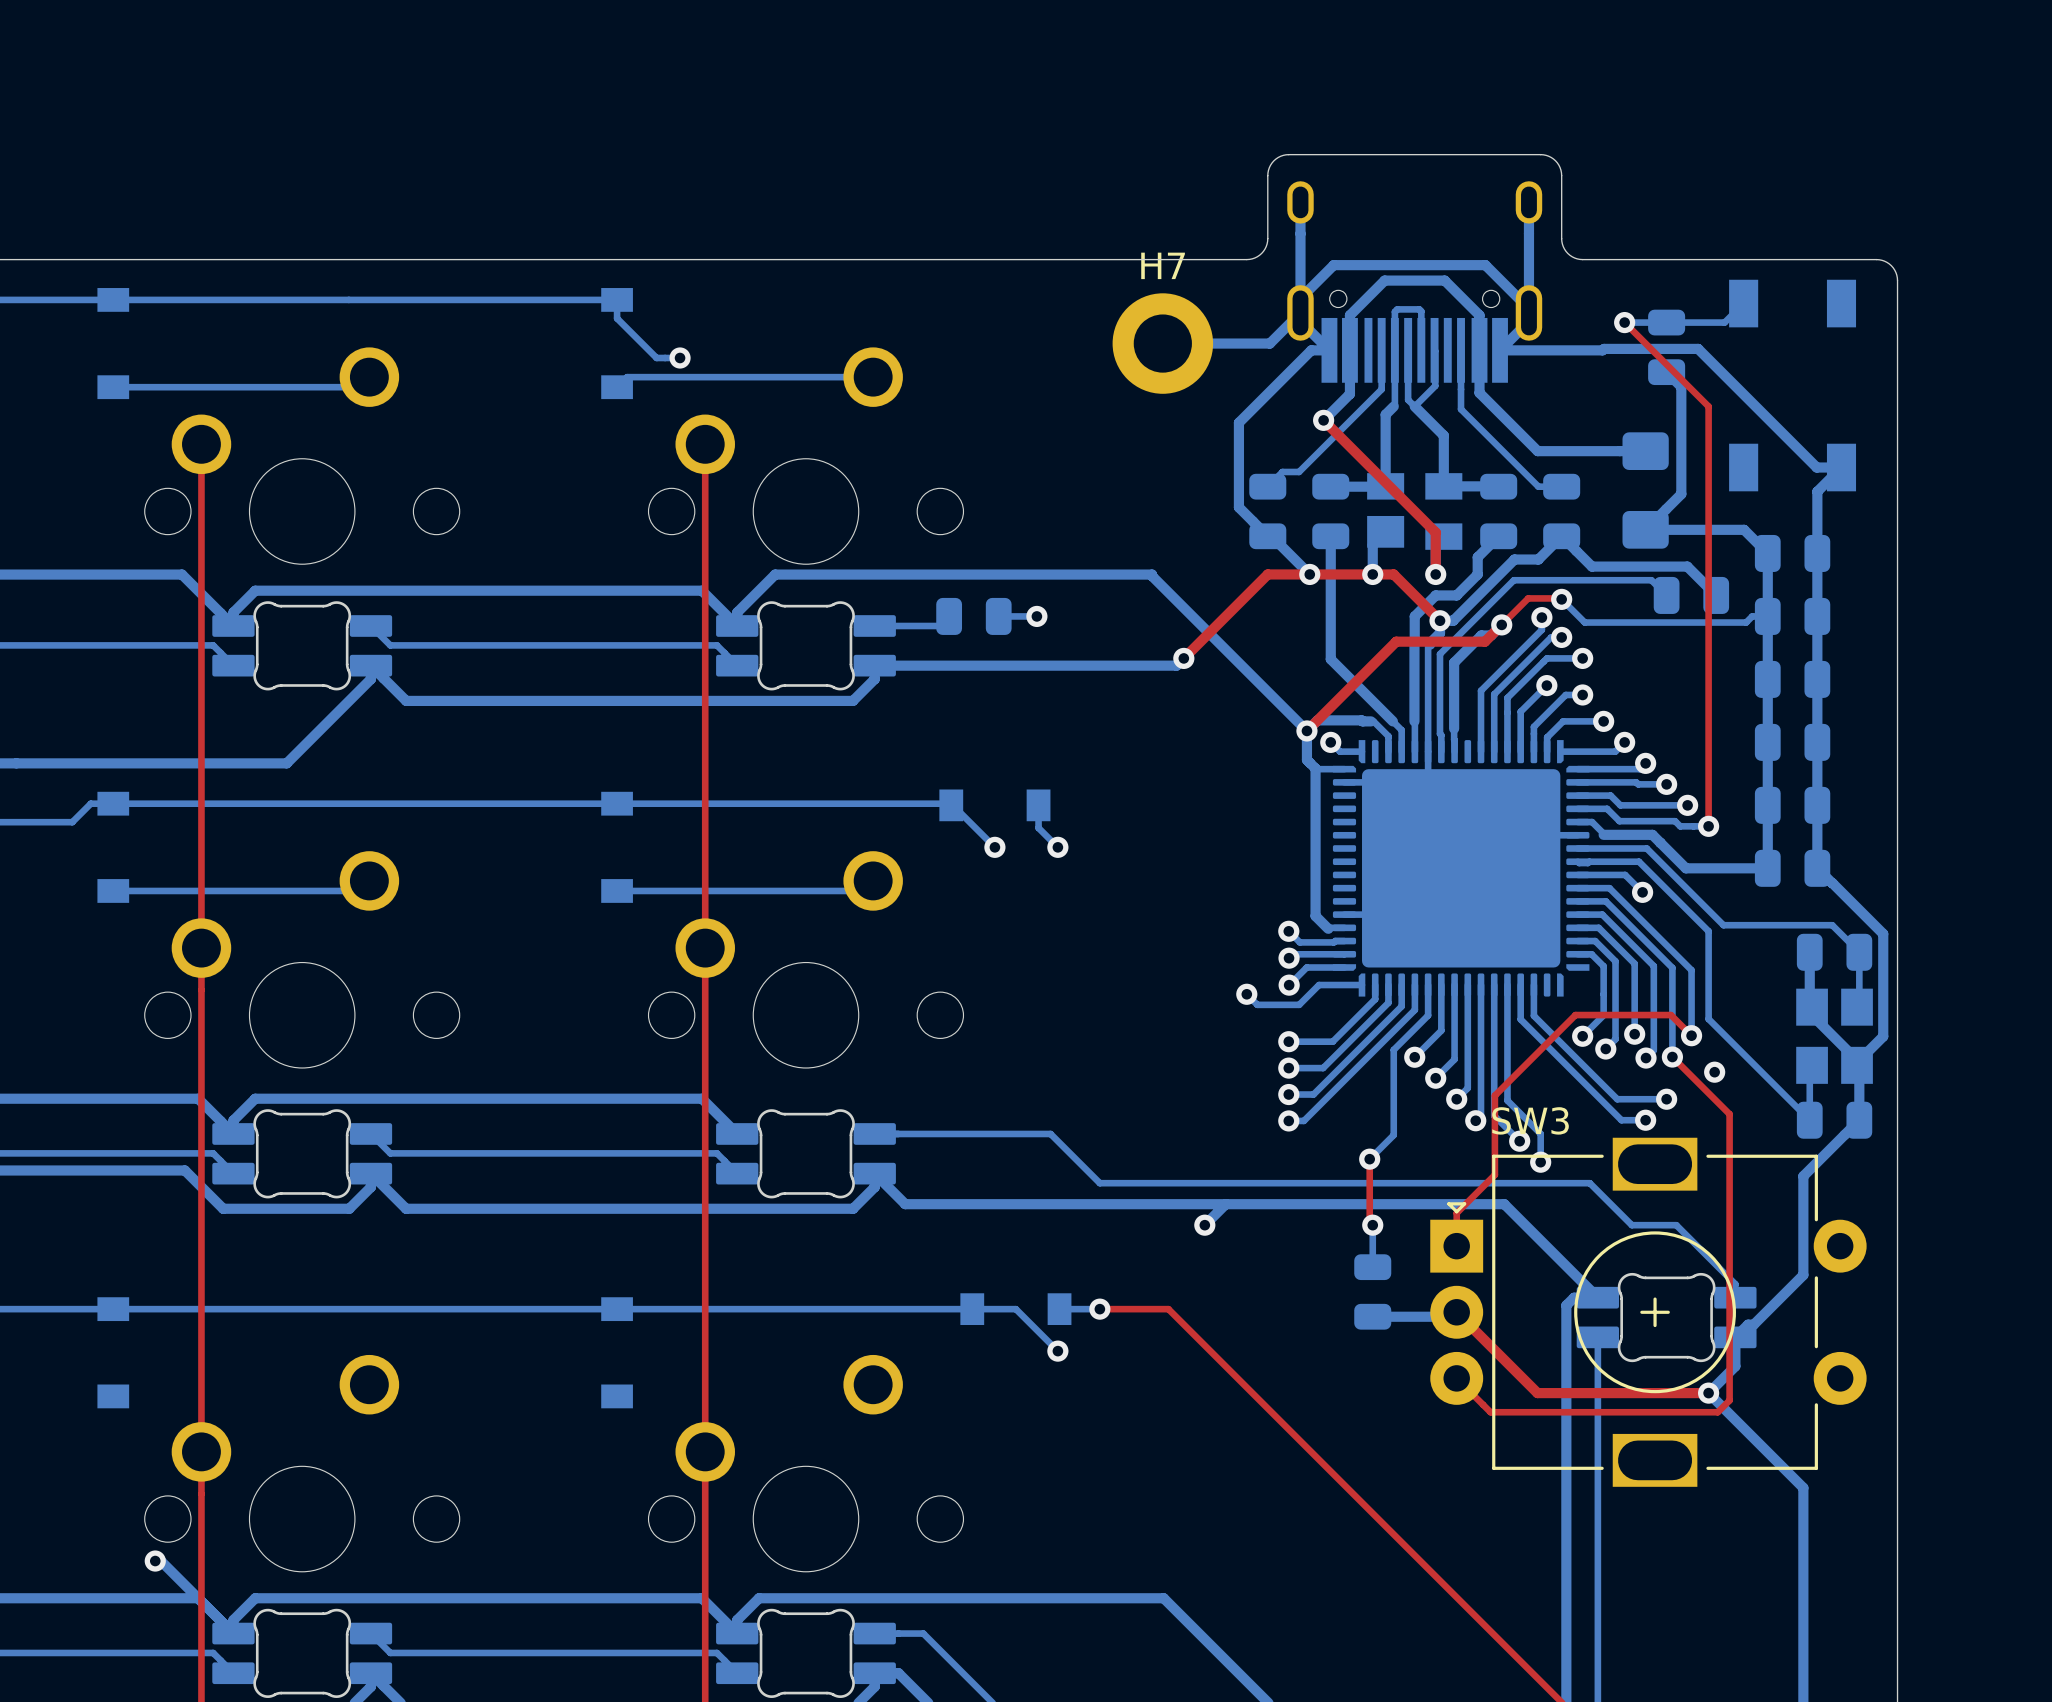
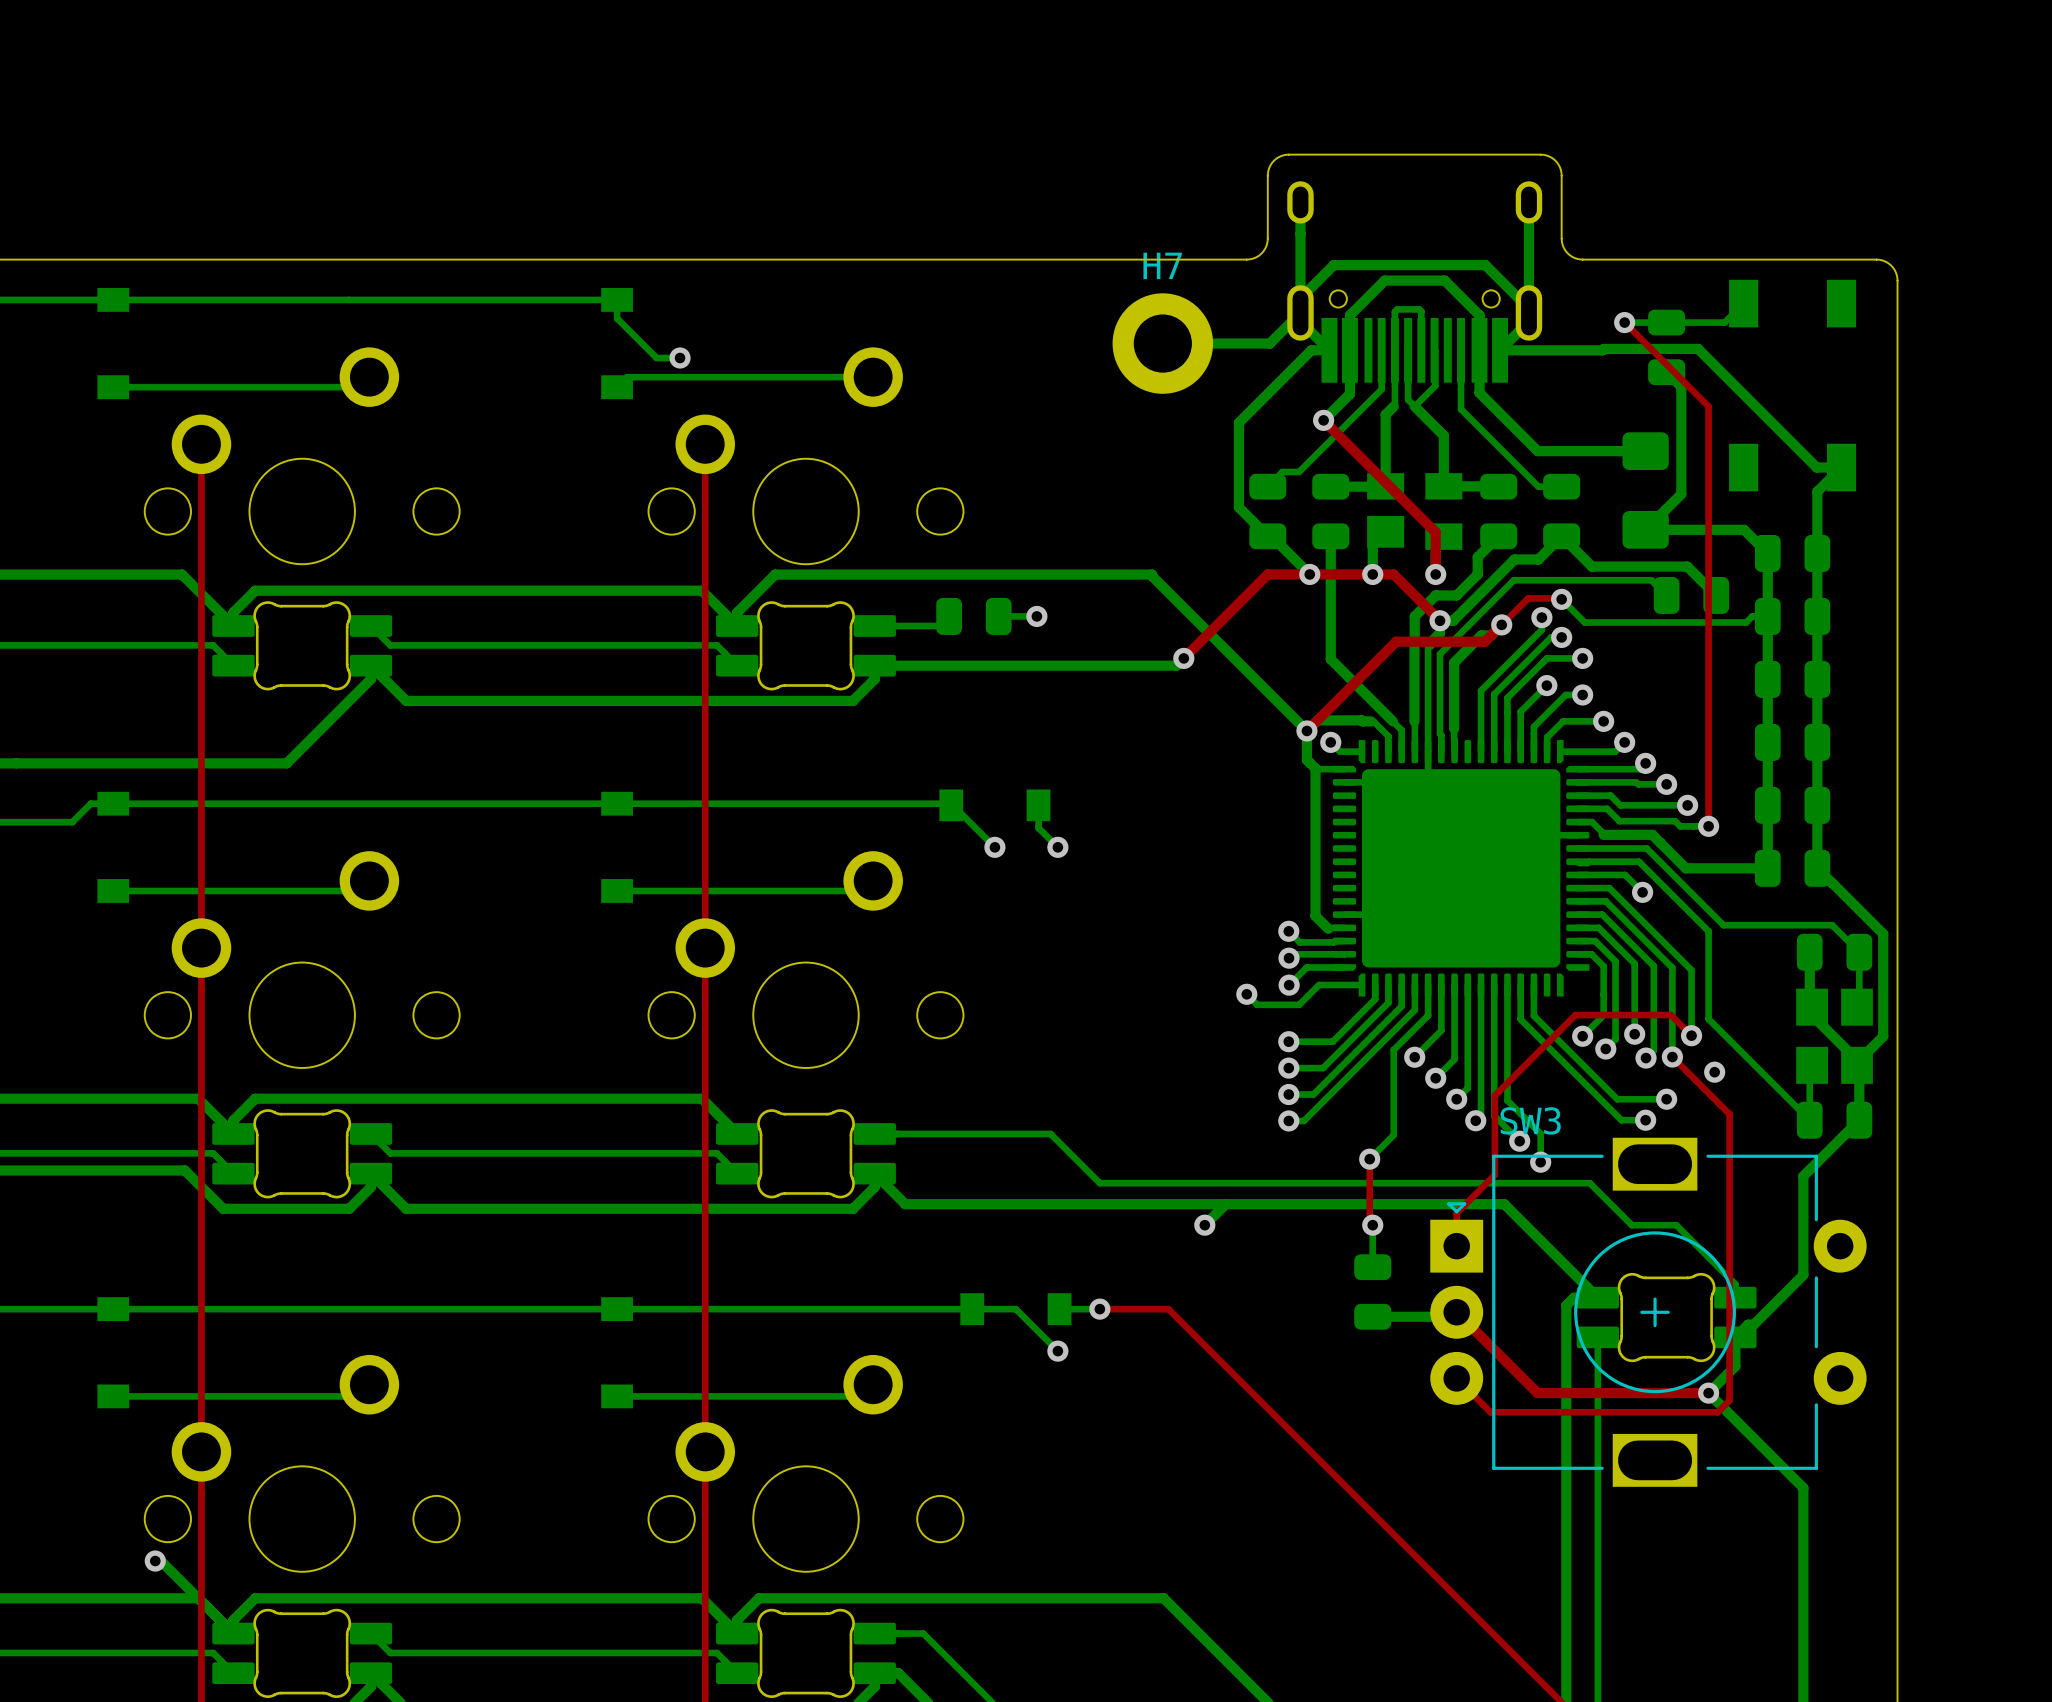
bottom track: none -> (369, 1384) (357, 1396) (113, 1396)
bottom track: none -> (873, 1384) (861, 1396) (617, 1396)

